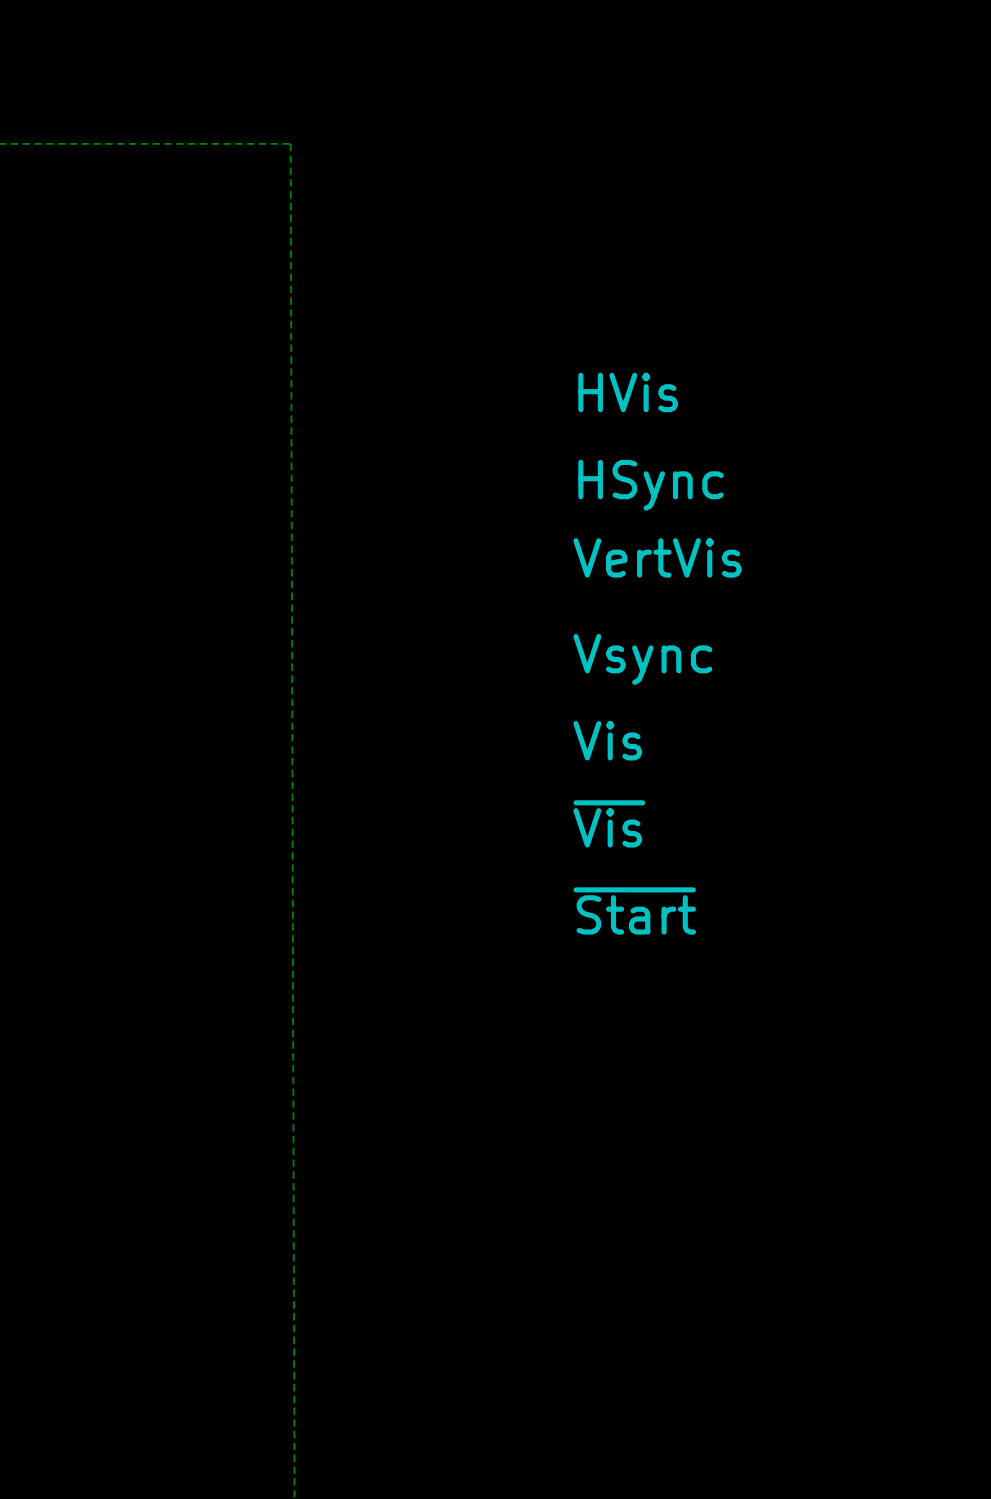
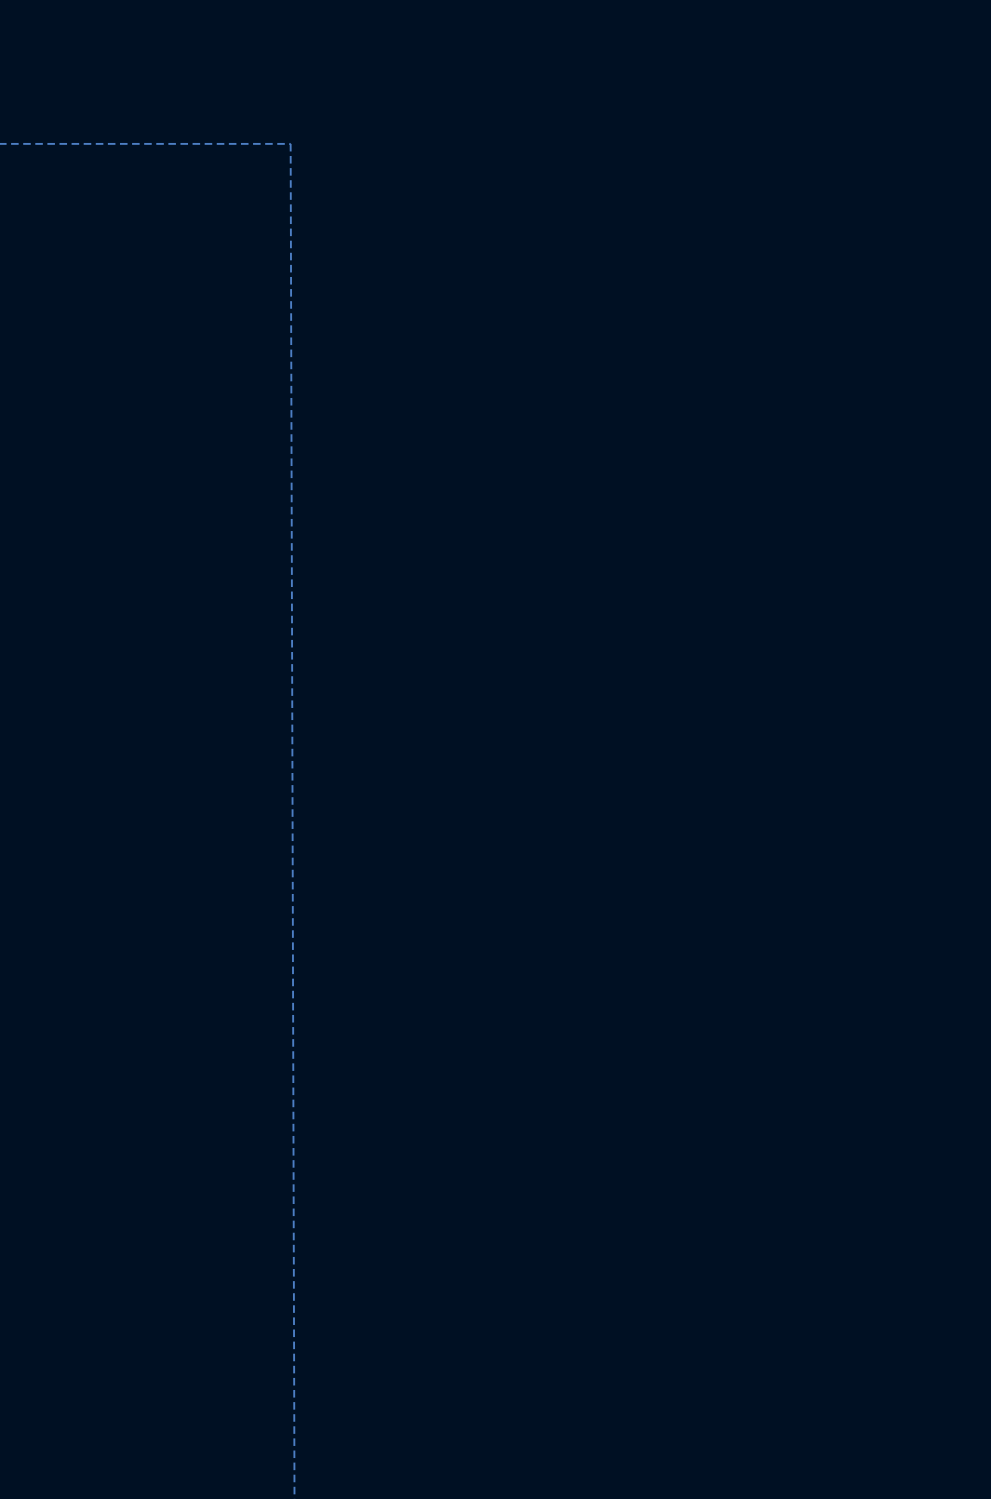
text: HVis (628, 392) -> none
text: HSync (651, 485) -> none
text: VertVis (657, 557) -> none
text: Vsync (642, 659) -> none
text: Vis (607, 740) -> none
text: ~{Vis} (609, 823) -> none
text: ~{Start} (634, 910) -> none

